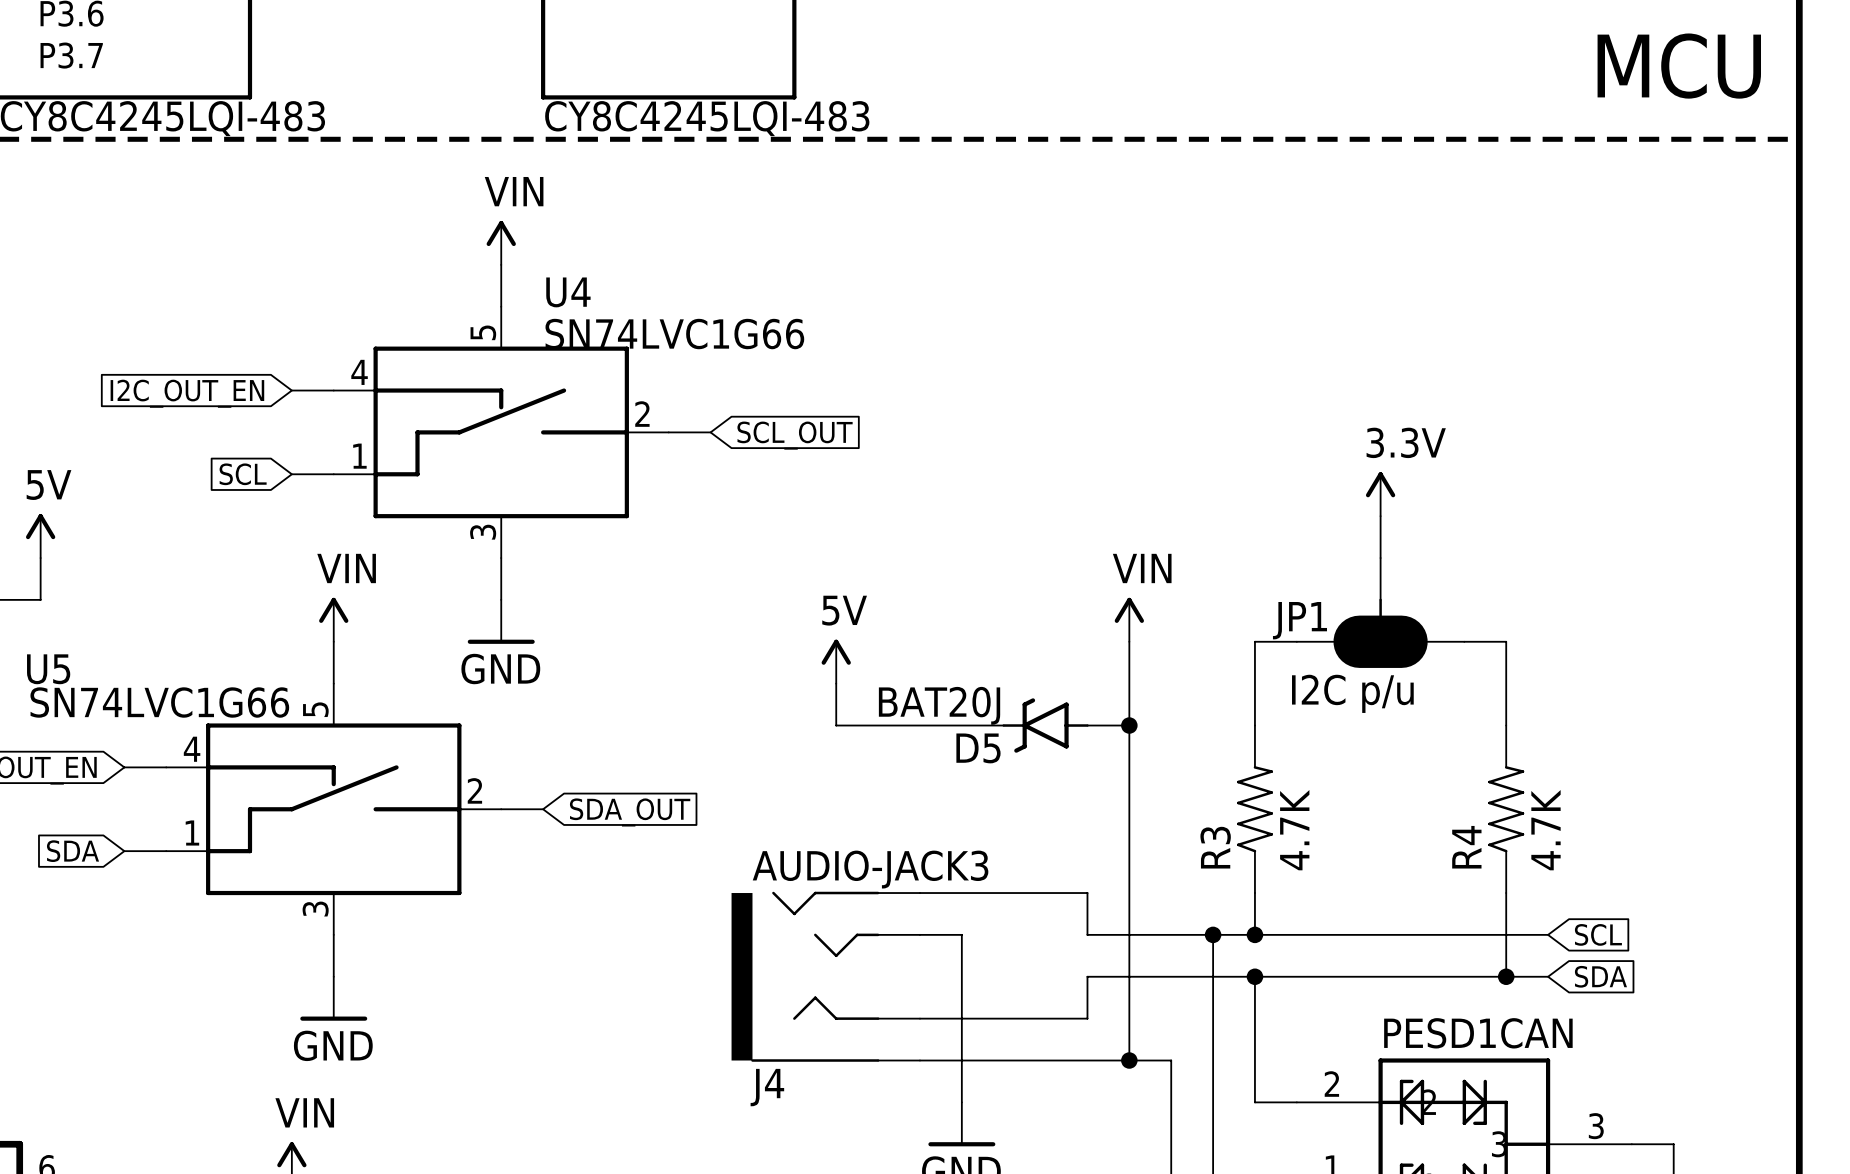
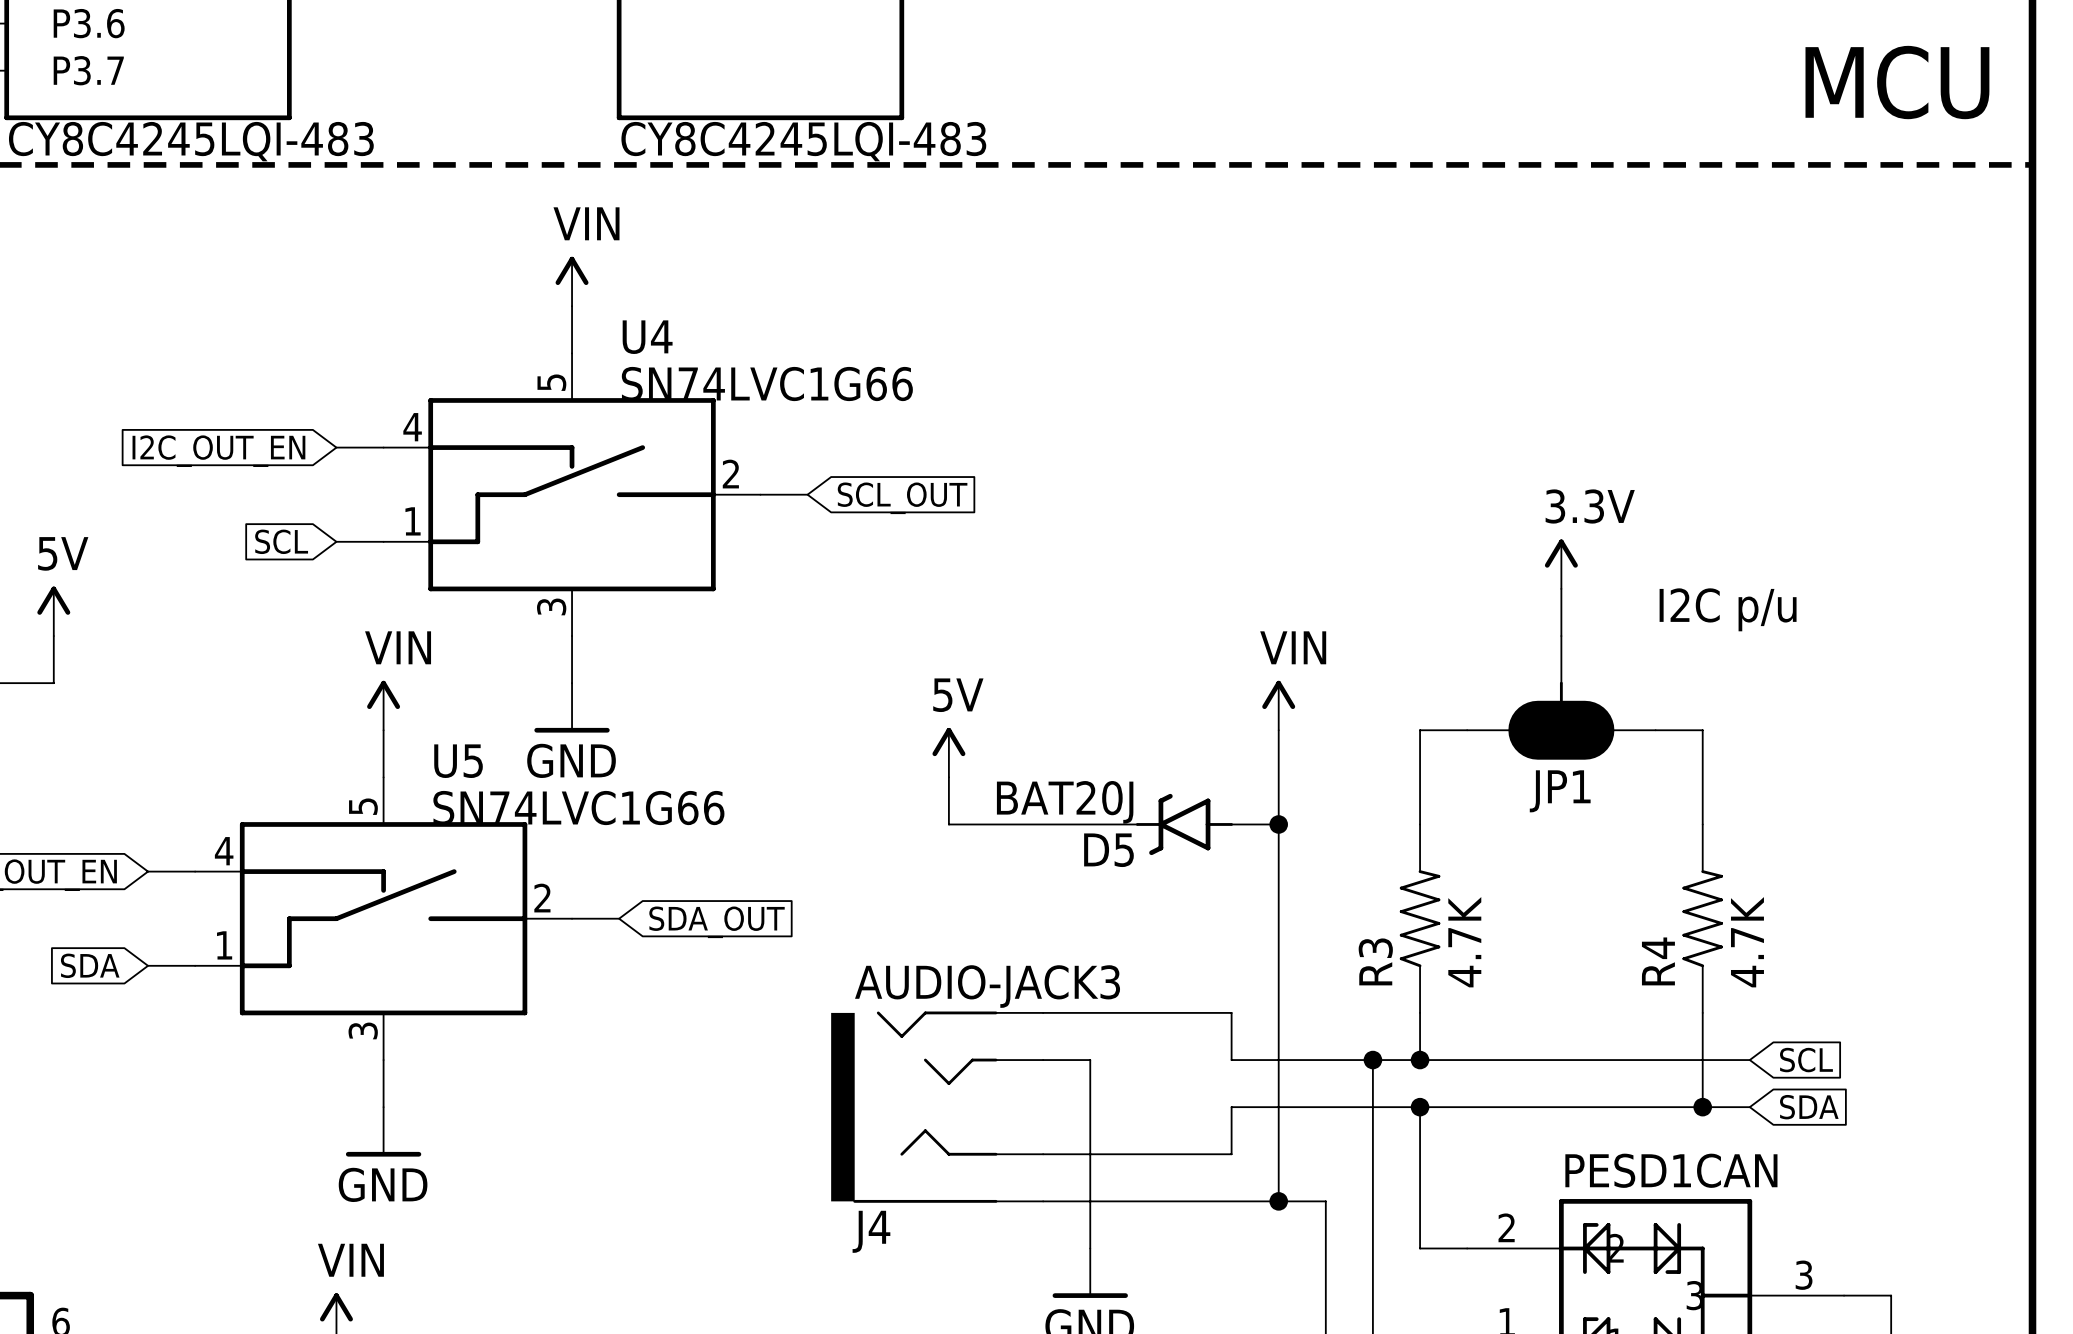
JP1 name position: JP1 (1299, 620) -> JP1 (1560, 791)
U5 name position: U5 (48, 669) -> U5 (458, 761)
text position: I2C p/u (1352, 693) -> I2C p/u (1728, 609)
U5 value position: SN74LVC1G66 (159, 702) -> SN74LVC1G66 (578, 808)

